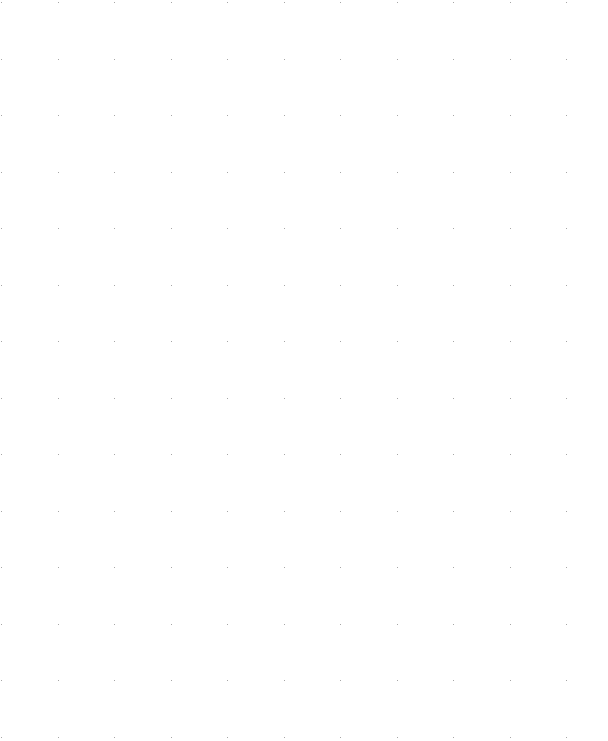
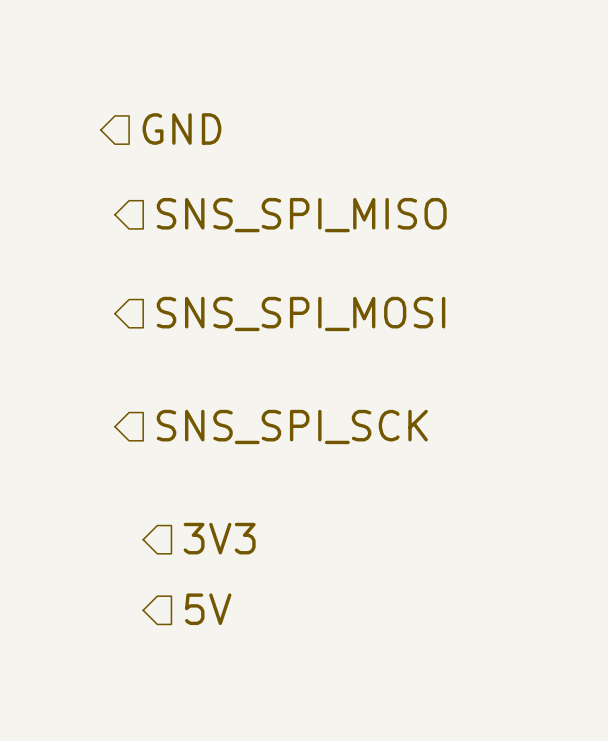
hierarchical label: none -> GND (181, 129)
hierarchical label: none -> SNS_SPI_MISO (301, 215)
hierarchical label: none -> SNS_SPI_MOSI (301, 313)
hierarchical label: none -> SNS_SPI_SCK (292, 426)
hierarchical label: none -> 3V3 (219, 538)
hierarchical label: none -> 5V (208, 609)

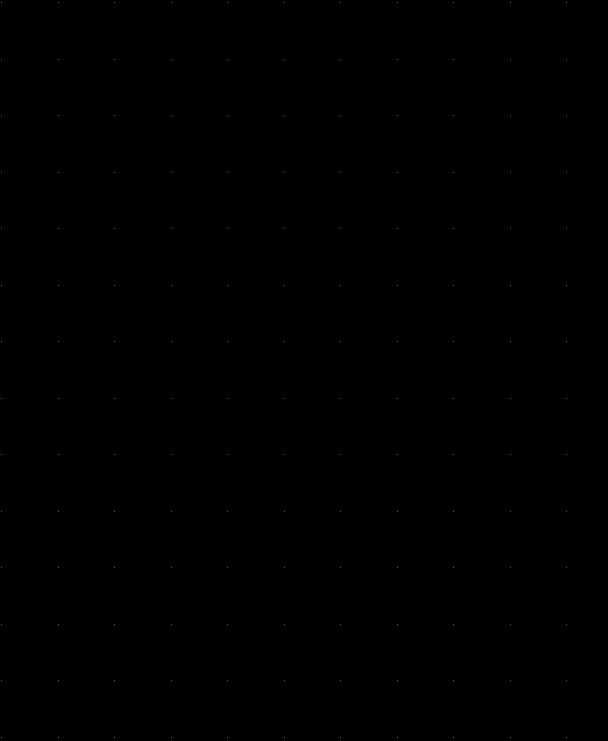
hierarchical label: GND (181, 129) -> none
hierarchical label: SNS_SPI_MISO (301, 215) -> none
hierarchical label: SNS_SPI_MOSI (301, 313) -> none
hierarchical label: SNS_SPI_SCK (292, 426) -> none
hierarchical label: 3V3 (219, 538) -> none
hierarchical label: 5V (208, 609) -> none

